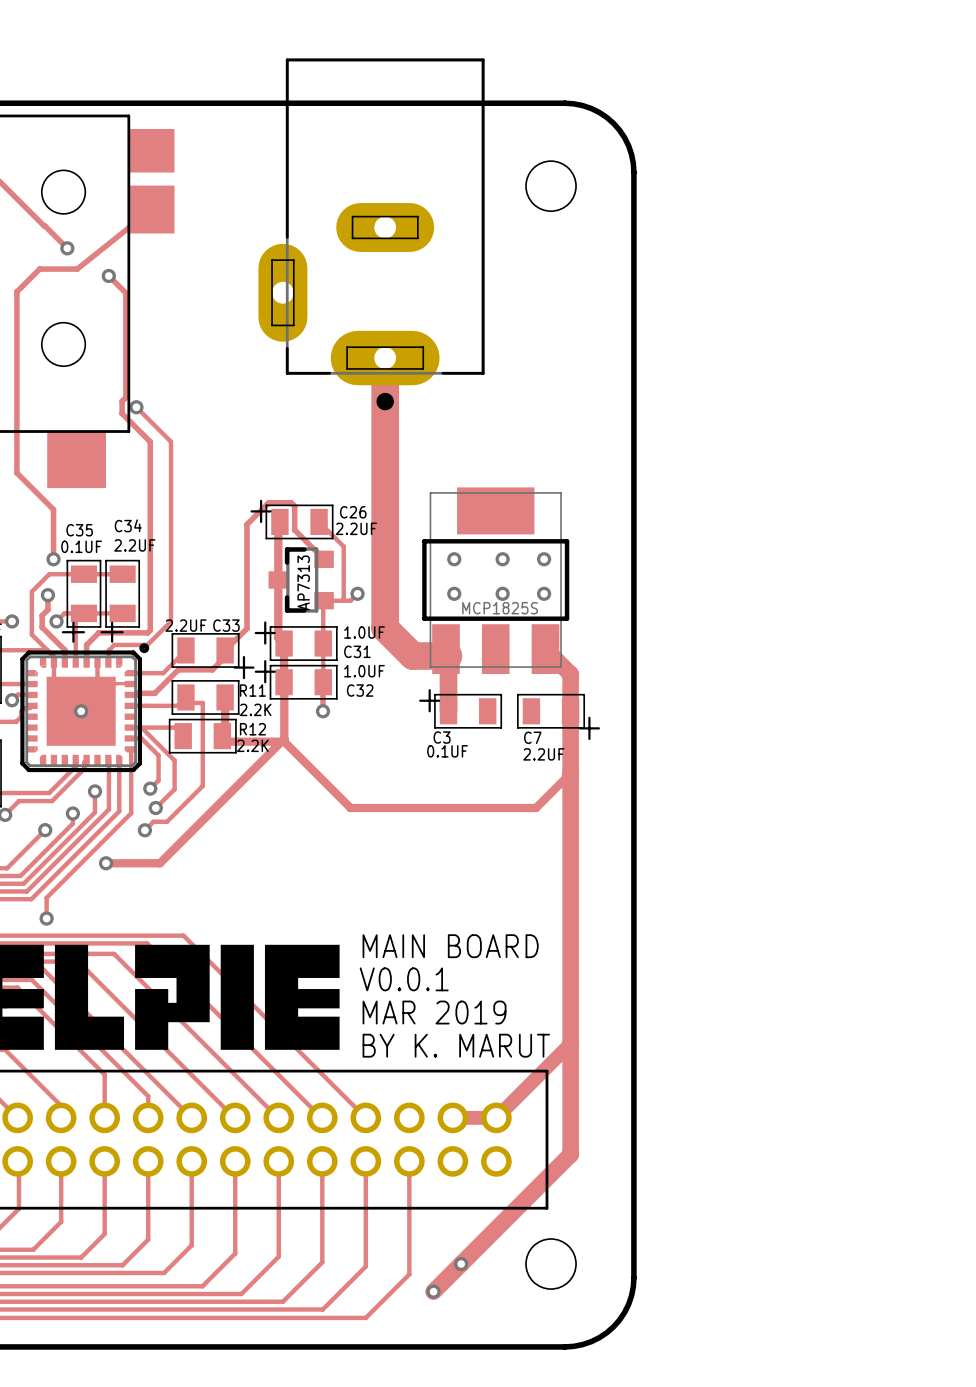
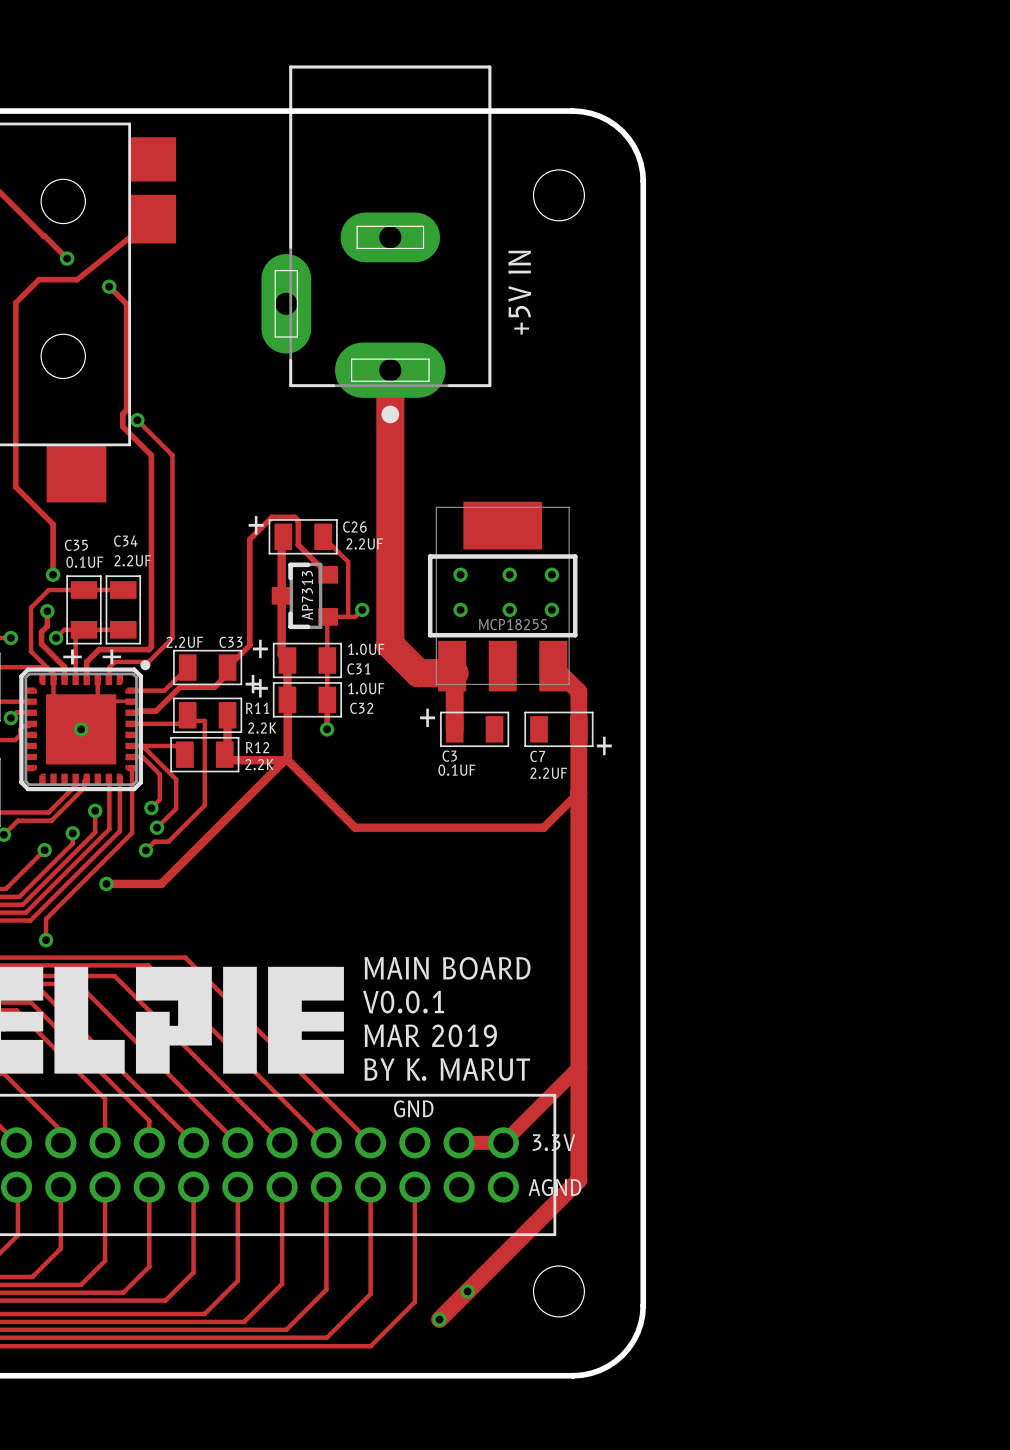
text: none -> +5V IN (519, 292)
text: none -> GND (413, 1108)
text: none -> 3.3V (554, 1142)
text: none -> AGND (554, 1187)

